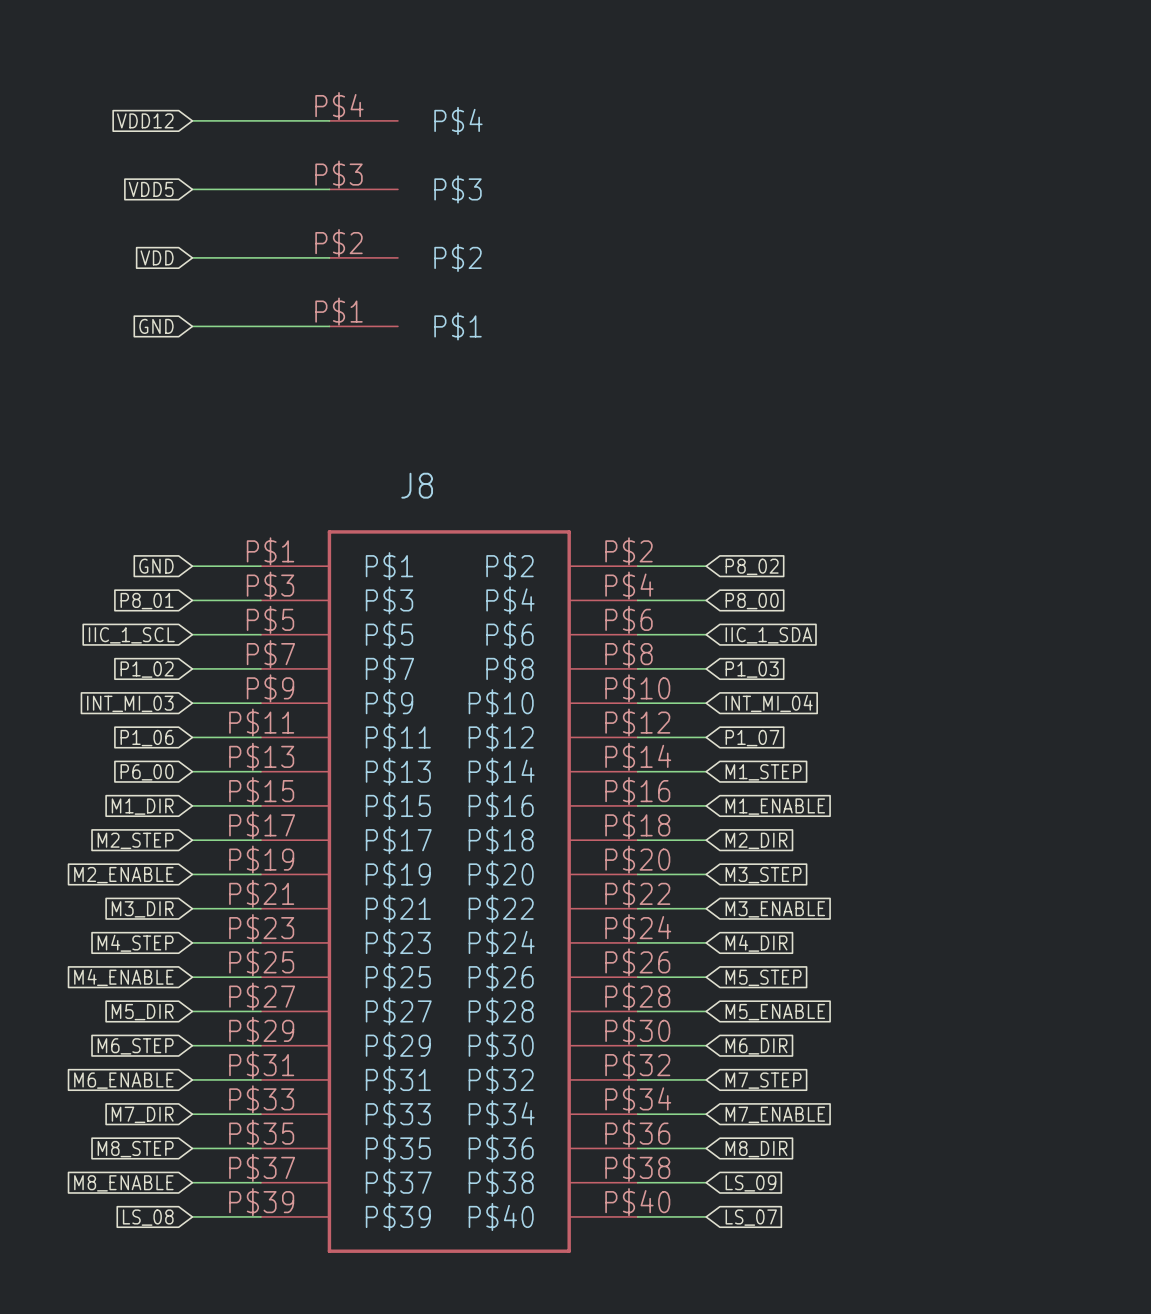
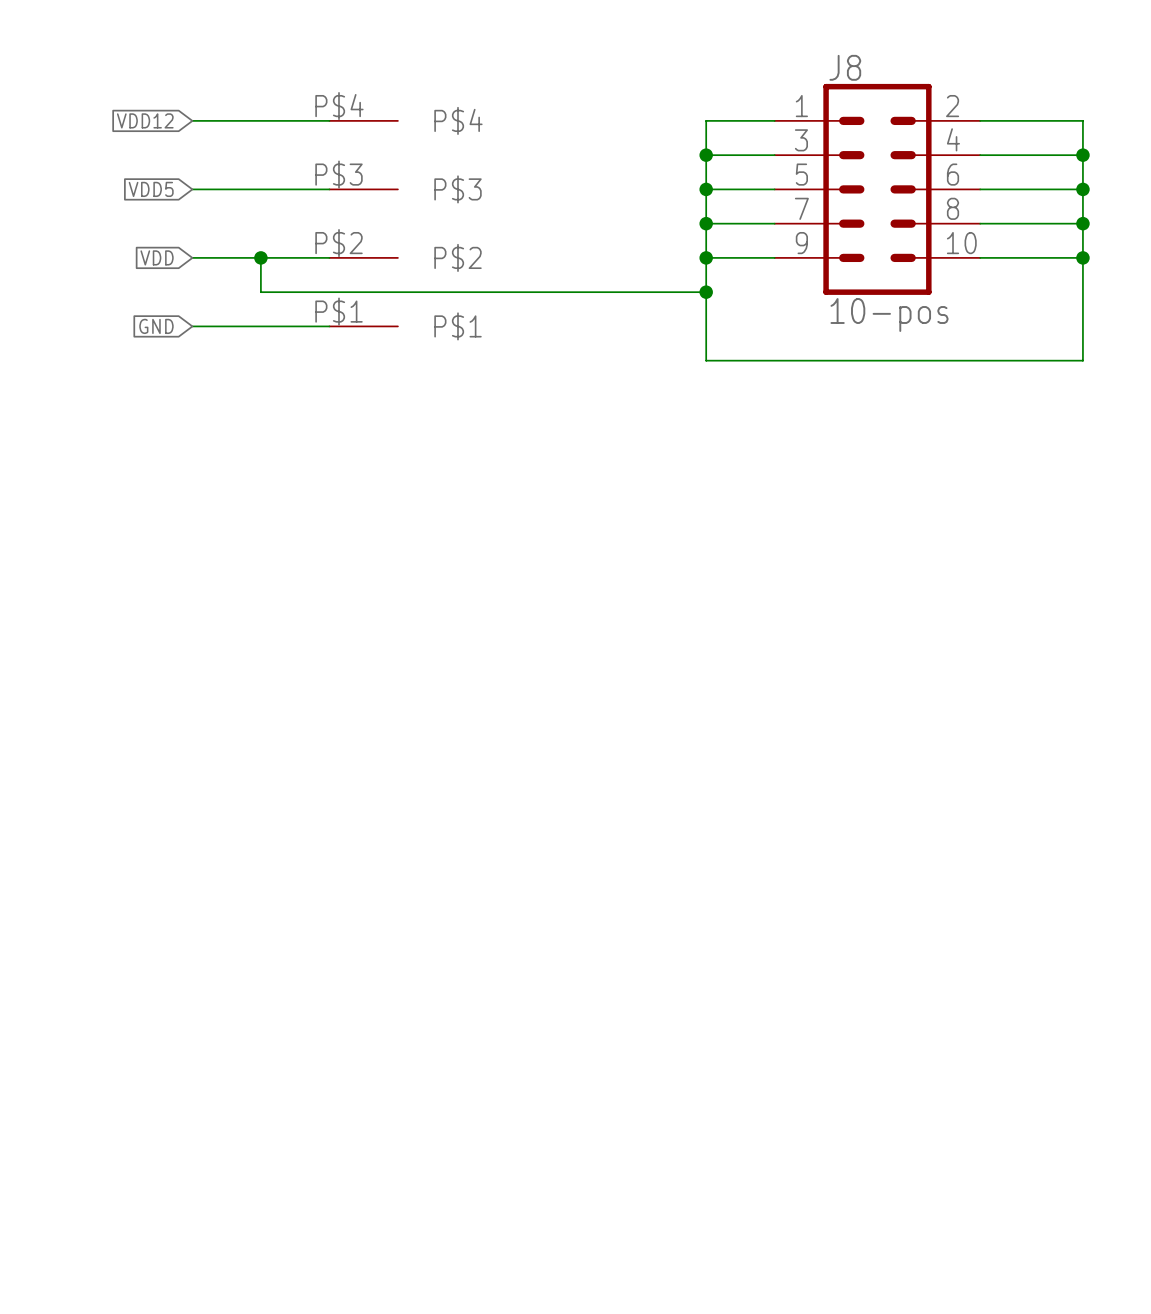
wire: none -> (774, 120) (706, 120) (706, 360) (1082, 360) (1082, 120) (980, 120)
wire: none -> (706, 155) (774, 155)
junction: none -> (706, 155)
wire: none -> (980, 155) (1082, 155)
junction: none -> (1082, 155)
wire: none -> (706, 189) (774, 189)
junction: none -> (706, 189)
wire: none -> (980, 189) (1082, 189)
junction: none -> (1082, 189)
wire: none -> (706, 223) (774, 223)
junction: none -> (706, 223)
wire: none -> (980, 223) (1082, 223)
junction: none -> (1082, 223)
wire: none -> (260, 257) (260, 292) (706, 292)
junction: none -> (260, 257)
junction: none -> (706, 257)
wire: none -> (980, 257) (1082, 257)
junction: none -> (1082, 257)
junction: none -> (706, 292)
J8 value: none -> 10-pos (889, 315)
J8 name position: J8 (417, 485) -> J8 (845, 67)
J8 symbol: [260, 530, 638, 1253] -> [774, 83, 981, 295]
global label: GND (156, 566) -> none
wire: (192, 566) (260, 566) -> none
wire: (637, 566) (706, 566) -> (706, 257) (774, 257)
global label: P8_02 (752, 566) -> none
wire: (192, 600) (260, 600) -> none
wire: (637, 600) (706, 600) -> none
global label: P8_01 (147, 601) -> none
global label: P8_00 (752, 601) -> none
wire: (192, 634) (260, 634) -> none
wire: (637, 634) (706, 634) -> none
global label: IIC_1_SCL (131, 635) -> none
global label: IIC_1_SDA (768, 635) -> none
wire: (192, 668) (260, 668) -> none
wire: (637, 668) (706, 668) -> none
global label: P1_02 (147, 669) -> none
global label: P1_03 (752, 669) -> none
global label: INT_MI_03 (130, 703) -> none
wire: (192, 703) (260, 703) -> none
wire: (637, 703) (706, 703) -> none
global label: INT_MI_04 (769, 703) -> none
wire: (192, 737) (260, 737) -> none
wire: (637, 737) (706, 737) -> none
global label: P1_06 (147, 738) -> none
global label: P1_07 (752, 738) -> none
wire: (192, 771) (260, 771) -> none
wire: (637, 771) (706, 771) -> none
global label: P6_00 (147, 772) -> none
global label: M1_STEP (763, 772) -> none
wire: (192, 805) (260, 805) -> none
wire: (637, 805) (706, 805) -> none
global label: M1_DIR (142, 806) -> none
global label: M1_ENABLE (775, 806) -> none
global label: M2_STEP (135, 840) -> none
wire: (192, 840) (260, 840) -> none
wire: (637, 840) (706, 840) -> none
global label: M2_DIR (756, 840) -> none
wire: (192, 874) (260, 874) -> none
wire: (637, 874) (706, 874) -> none
global label: M2_ENABLE (123, 875) -> none
global label: M3_STEP (763, 875) -> none
wire: (192, 908) (260, 908) -> none
wire: (637, 908) (706, 908) -> none
global label: M3_DIR (142, 909) -> none
global label: M3_ENABLE (775, 909) -> none
wire: (192, 942) (260, 942) -> none
wire: (637, 942) (706, 942) -> none
global label: M4_STEP (135, 943) -> none
global label: M4_DIR (756, 943) -> none
global label: M4_ENABLE (123, 977) -> none
wire: (192, 977) (260, 977) -> none
wire: (637, 977) (706, 977) -> none
global label: M5_STEP (763, 977) -> none
wire: (192, 1011) (260, 1011) -> none
wire: (637, 1011) (706, 1011) -> none
global label: M5_DIR (142, 1012) -> none
global label: M5_ENABLE (775, 1012) -> none
wire: (192, 1045) (260, 1045) -> none
wire: (637, 1045) (706, 1045) -> none
global label: M6_STEP (135, 1046) -> none
global label: M6_DIR (756, 1046) -> none
wire: (192, 1079) (260, 1079) -> none
wire: (637, 1079) (706, 1079) -> none
global label: M6_ENABLE (123, 1080) -> none
global label: M7_STEP (763, 1080) -> none
global label: M7_DIR (142, 1114) -> none
wire: (192, 1114) (260, 1114) -> none
wire: (637, 1114) (706, 1114) -> none
global label: M7_ENABLE (775, 1114) -> none
wire: (192, 1148) (260, 1148) -> none
wire: (637, 1148) (706, 1148) -> none
global label: M8_STEP (135, 1149) -> none
global label: M8_DIR (756, 1149) -> none
wire: (192, 1182) (260, 1182) -> none
wire: (637, 1182) (706, 1182) -> none
global label: M8_ENABLE (123, 1183) -> none
global label: LS_09 (750, 1183) -> none
wire: (192, 1216) (260, 1216) -> none
wire: (637, 1216) (706, 1216) -> none
global label: LS_08 (148, 1217) -> none
global label: LS_07 (751, 1217) -> none

